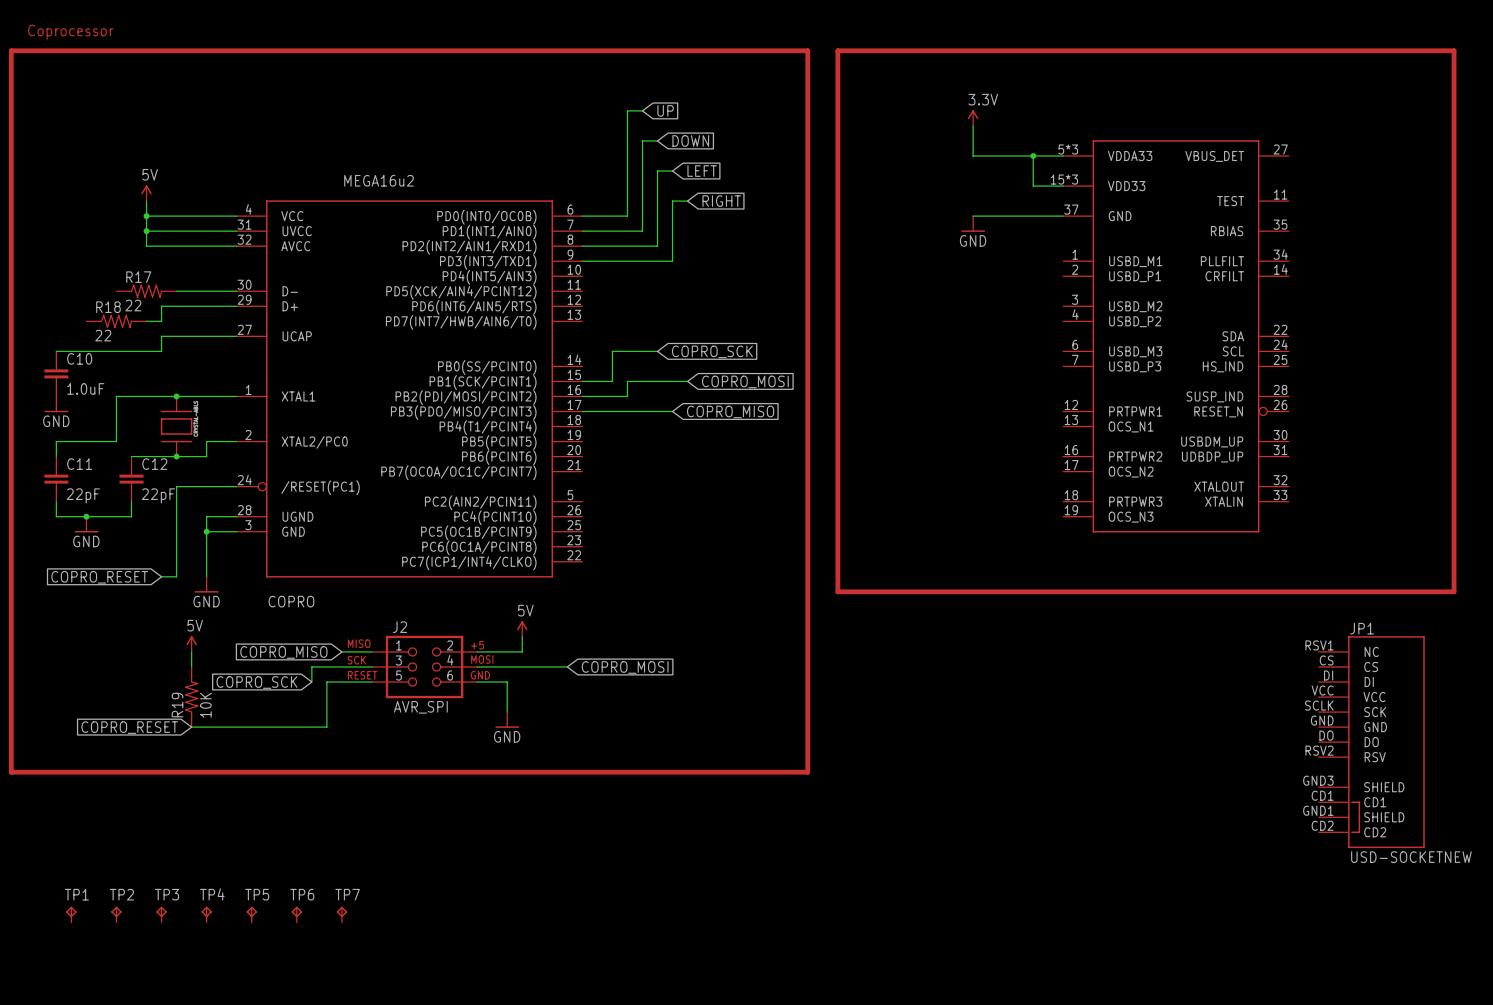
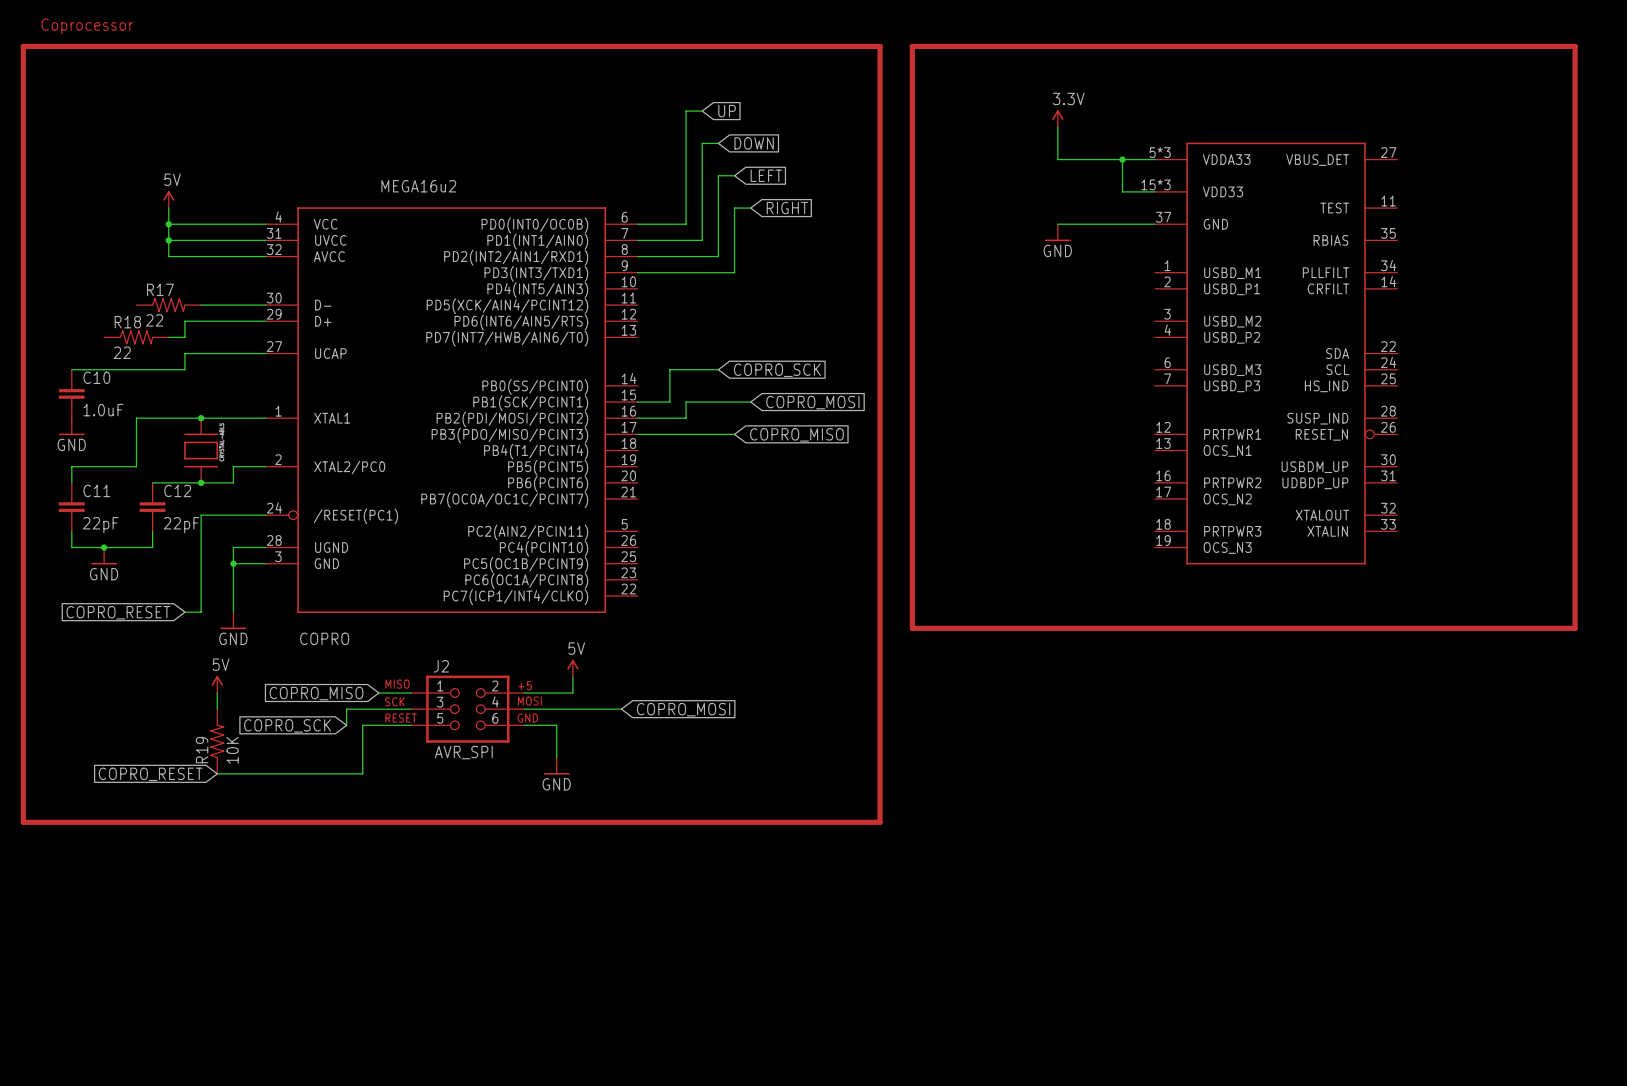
JP1: USD-SOCKETNEW (1371, 742) -> none
TP1: (71, 914) -> none
TP2: (116, 914) -> none
TP3: (161, 914) -> none
TP4: (206, 914) -> none
TP5: (251, 914) -> none
TP6: (296, 914) -> none
TP7: (341, 914) -> none

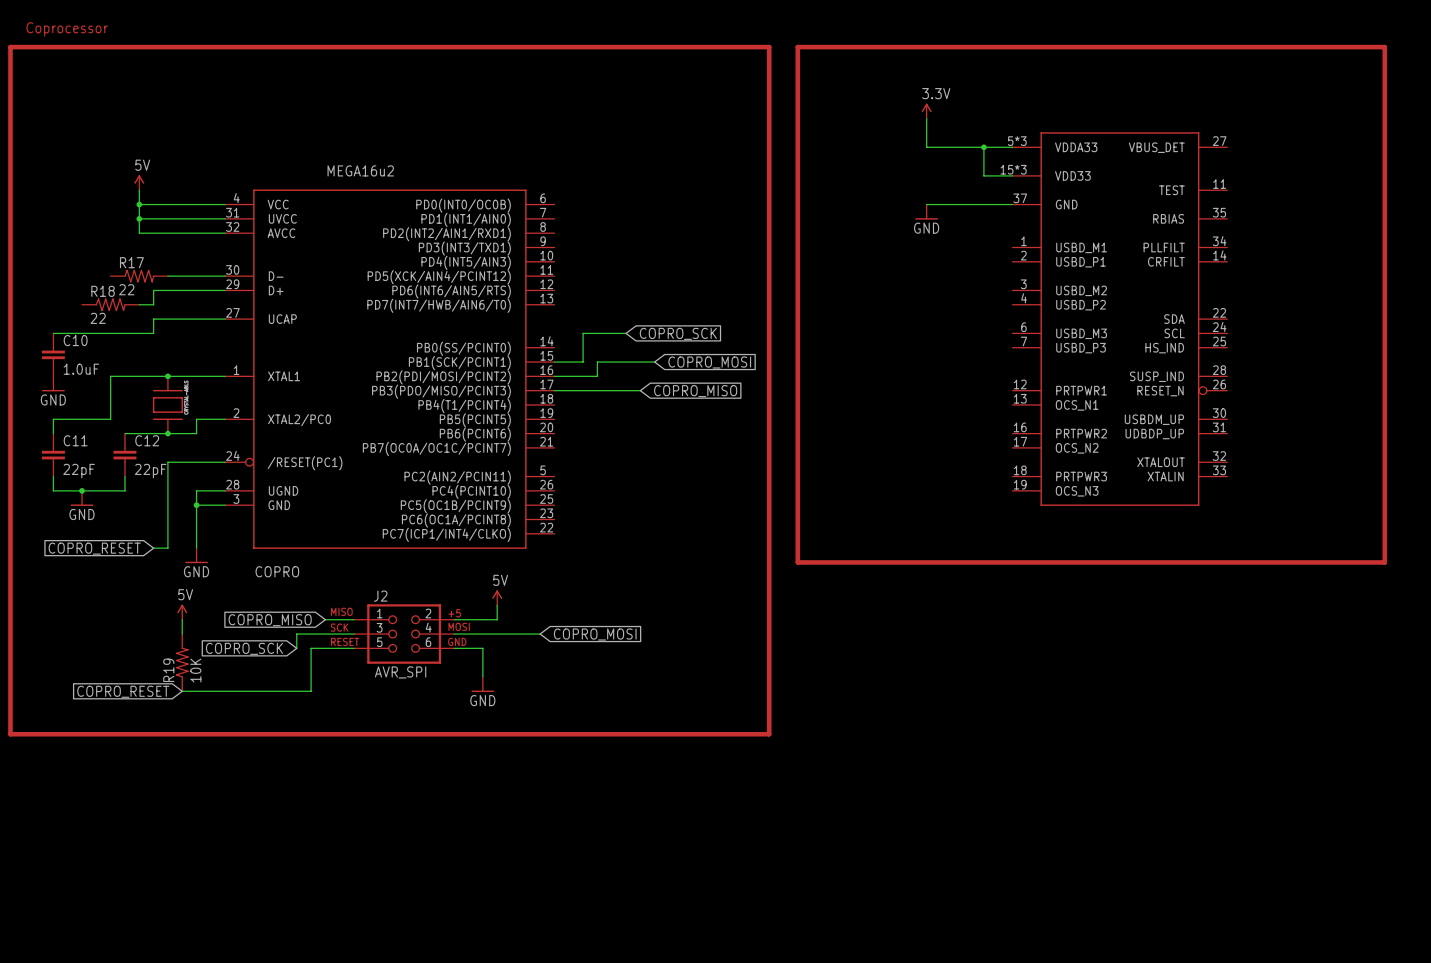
wire: (702, 111) (686, 111) (686, 224) (637, 224) -> none
global label: UP (727, 111) -> none
wire: (718, 143) (702, 143) (702, 240) (637, 240) -> none
global label: DOWN (754, 143) -> none
wire: (734, 175) (718, 175) (718, 256) (637, 256) -> none
global label: LEFT (766, 175) -> none
wire: (750, 208) (734, 208) (734, 272) (637, 272) -> none
global label: RIGHT (787, 208) -> none

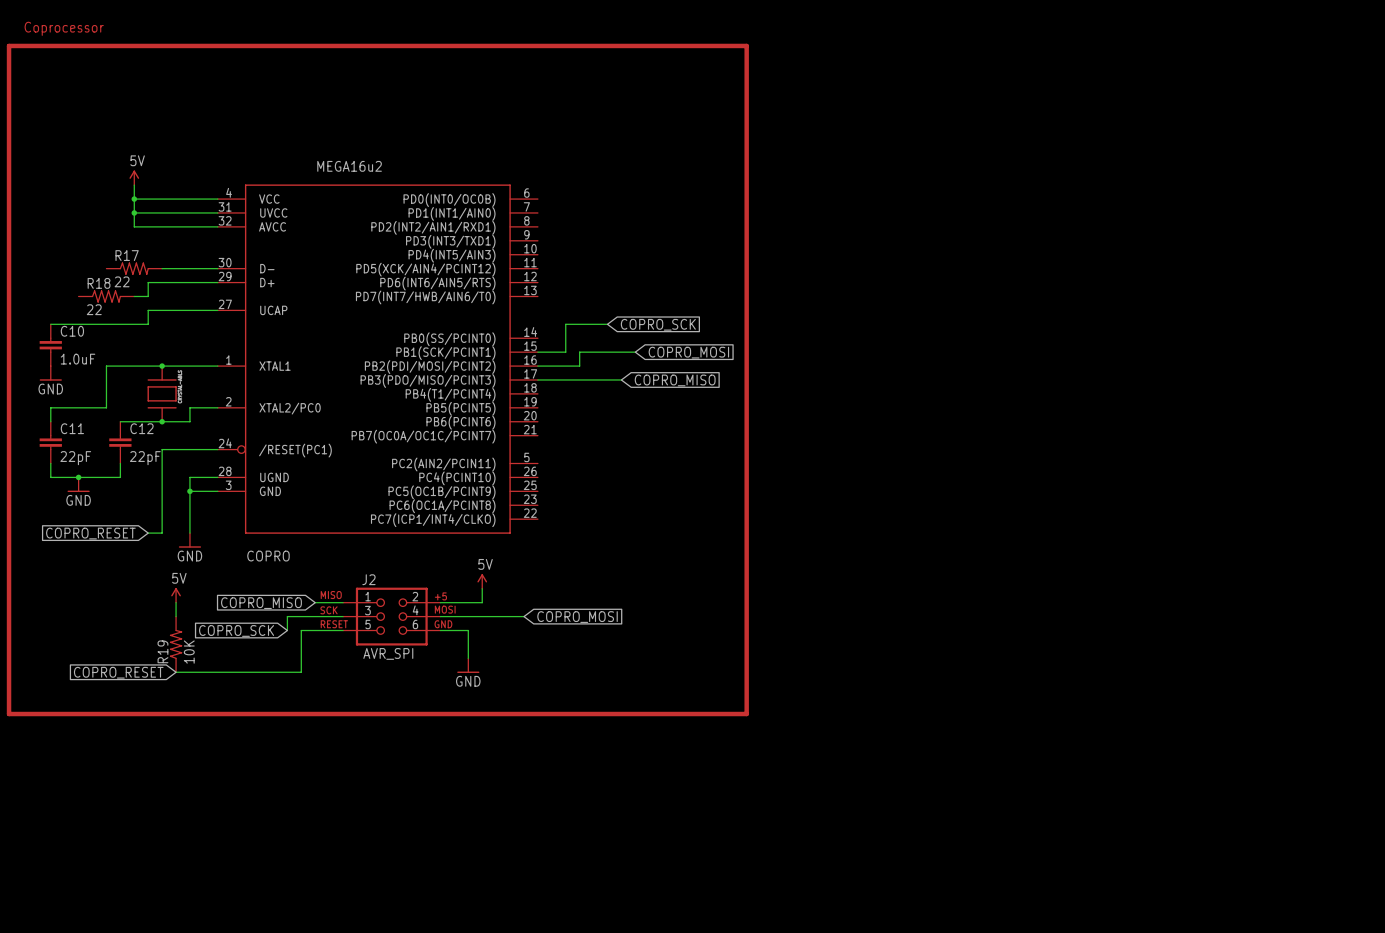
line: (797, 47) (1384, 47) (1384, 562) (797, 562) (797, 47) -> none
power symbol: 3.3V (926, 111) -> none
wire: (926, 118) (926, 147) (1012, 147) -> none
wire: (983, 147) (983, 175) (1012, 175) -> none
junction: (983, 147) -> none
wire: (926, 204) (1012, 204) -> none
power symbol: GND (926, 212) -> none
part: (1119, 319) -> none

